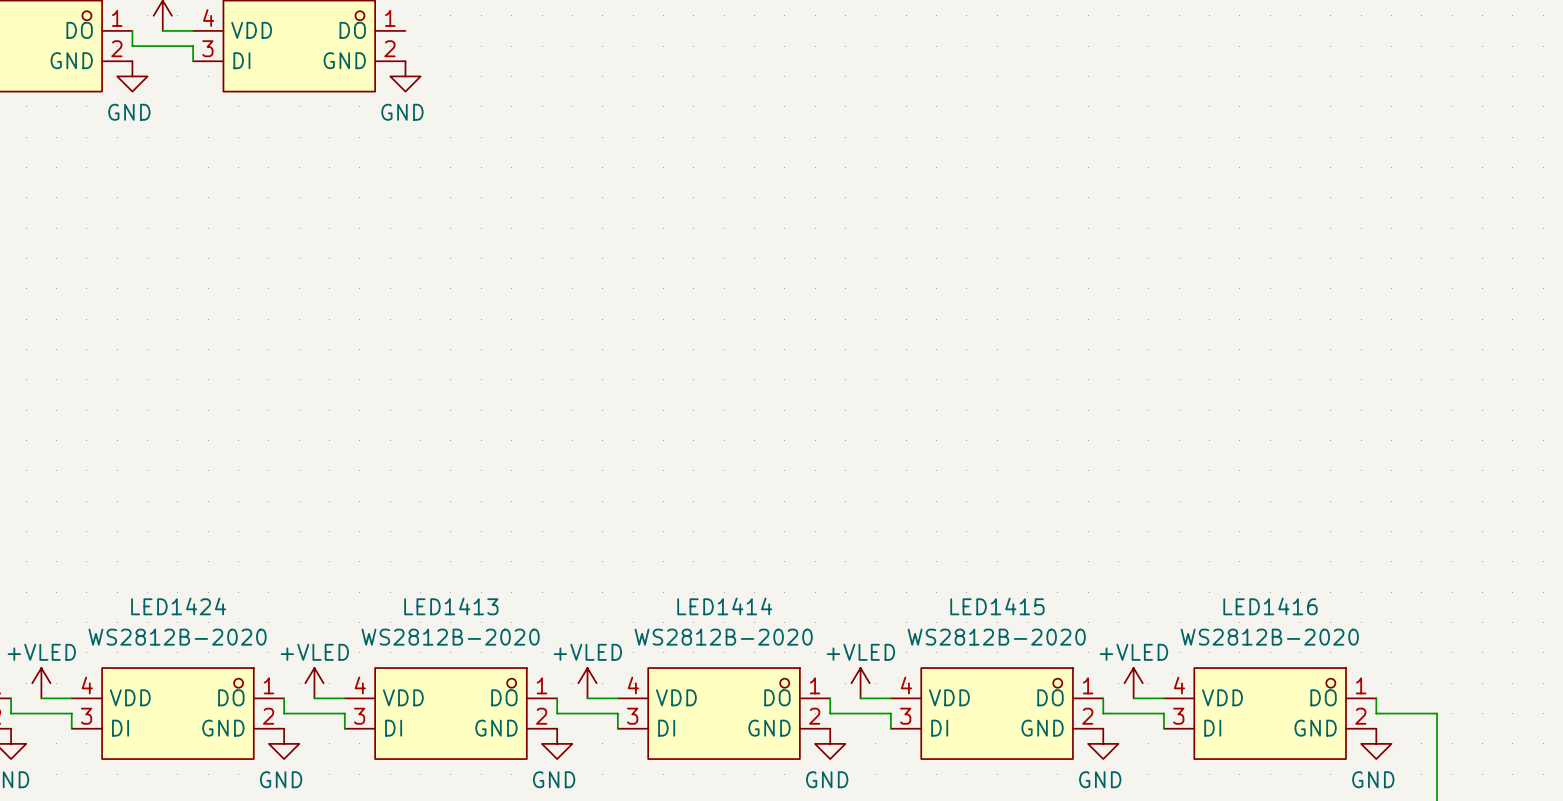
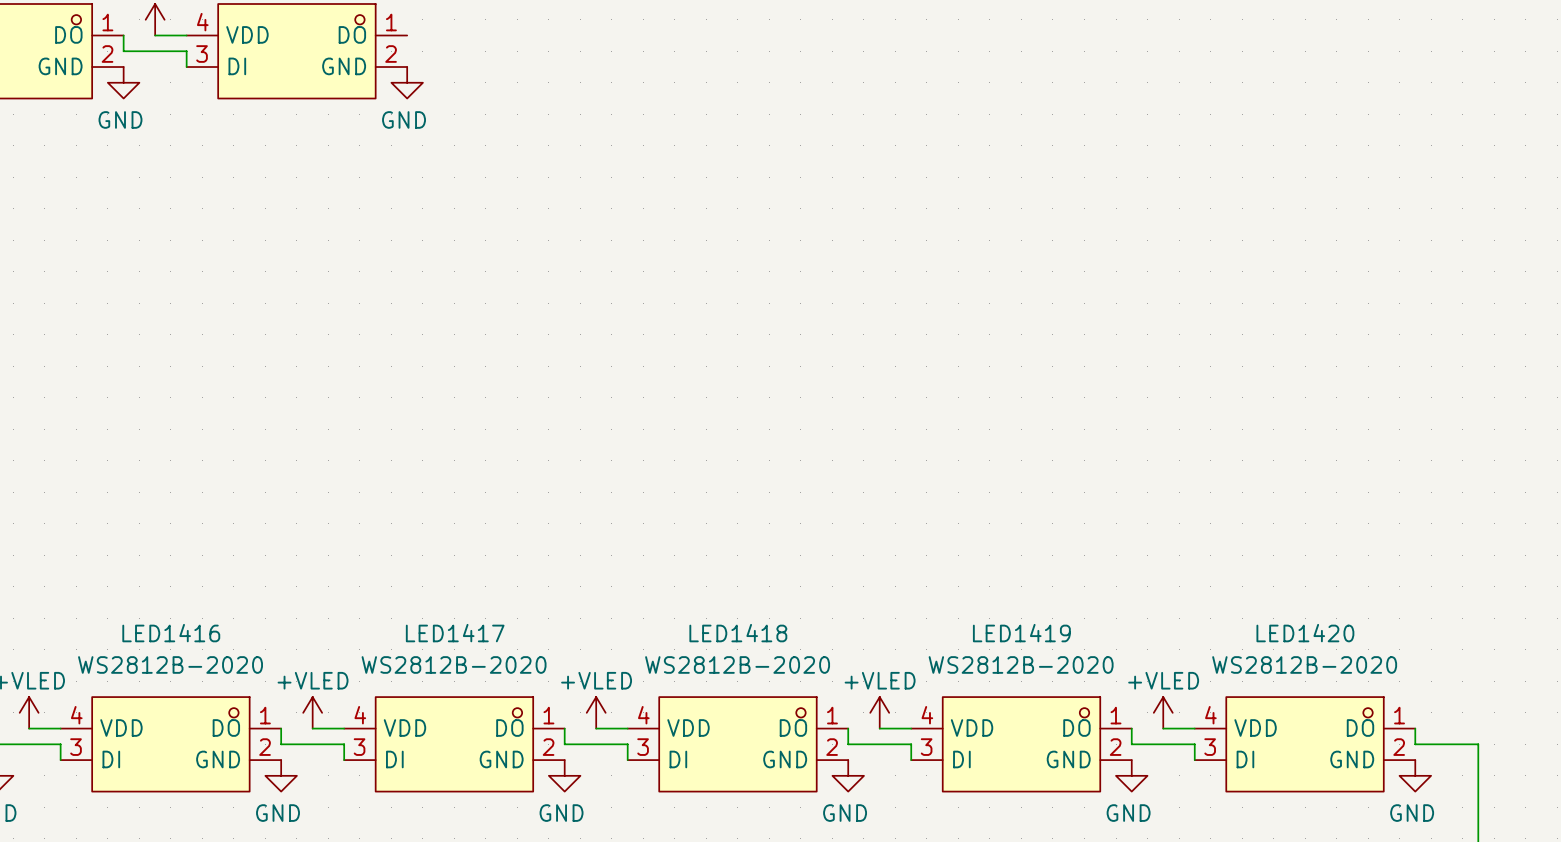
LED1424 name: LED1424 (178, 606) -> LED1416 (171, 633)
LED1413 name: LED1413 (451, 606) -> LED1417 (455, 633)
LED1414 name: LED1414 (724, 606) -> LED1418 (738, 633)
LED1415 name: LED1415 (997, 606) -> LED1419 (1021, 633)
LED1416 name: LED1416 (1270, 606) -> LED1420 (1305, 633)

